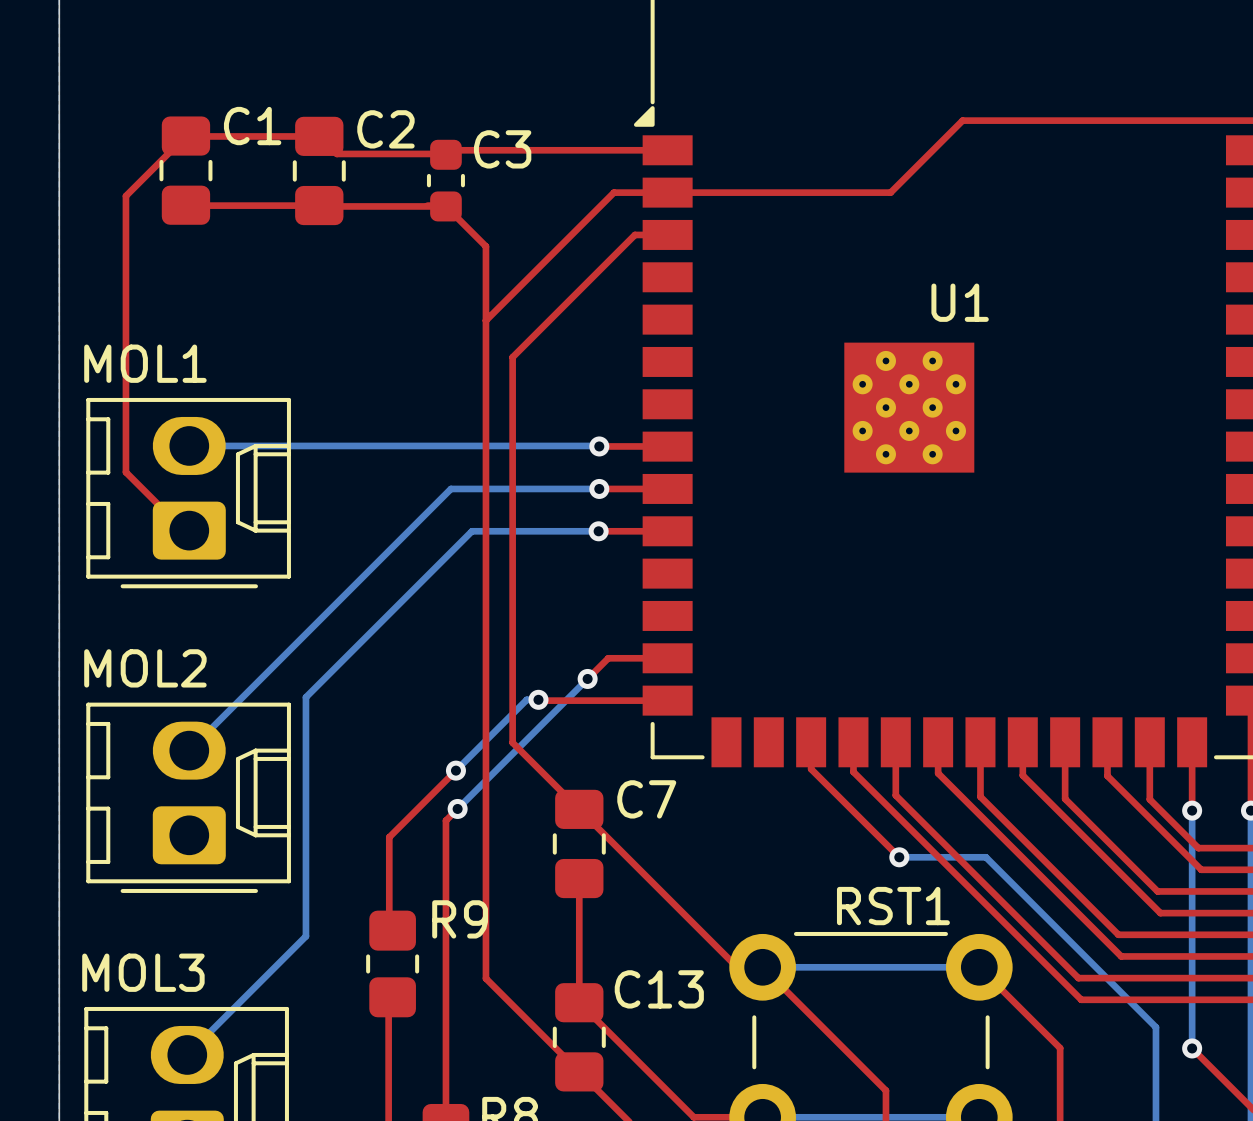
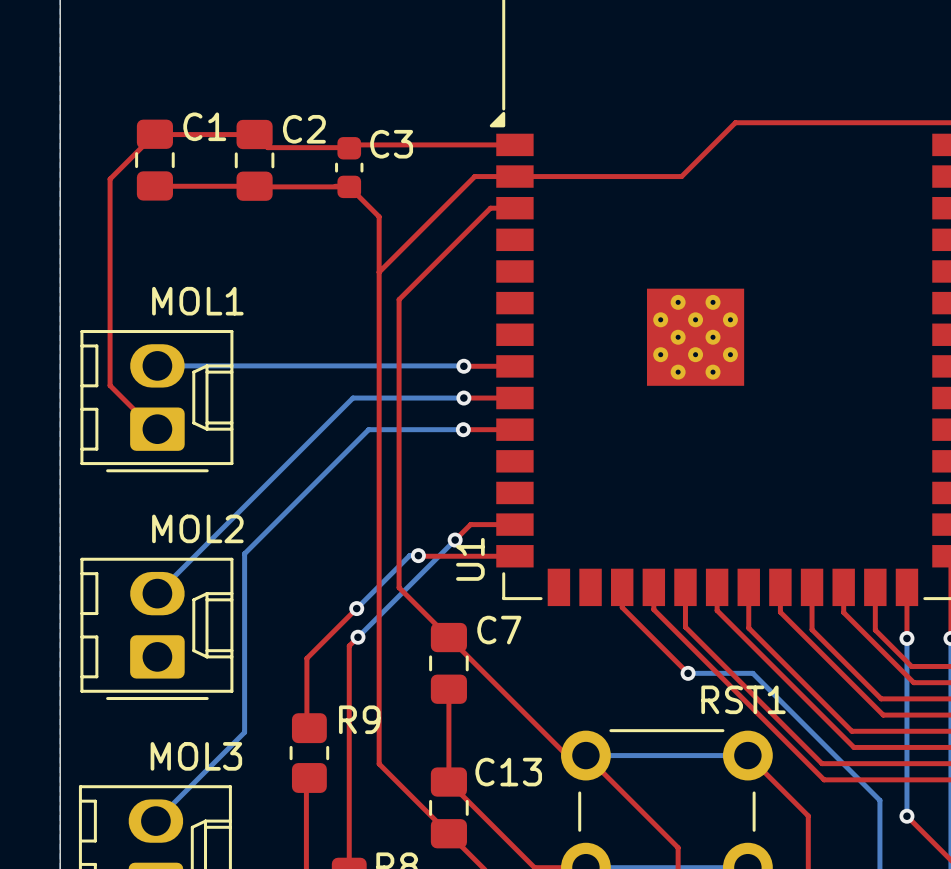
U1 name rotation: 0° (960, 302) -> 90° counterclockwise (470, 559)
U1 name position: U1 (960, 302) -> U1 (470, 559)
MOL1 name position: MOL1 (145, 363) -> MOL1 (197, 301)
MOL2 name position: MOL2 (145, 668) -> MOL2 (197, 528)
RST1 name position: RST1 (893, 906) -> RST1 (743, 699)
MOL3 name position: MOL3 (143, 972) -> MOL3 (196, 756)

